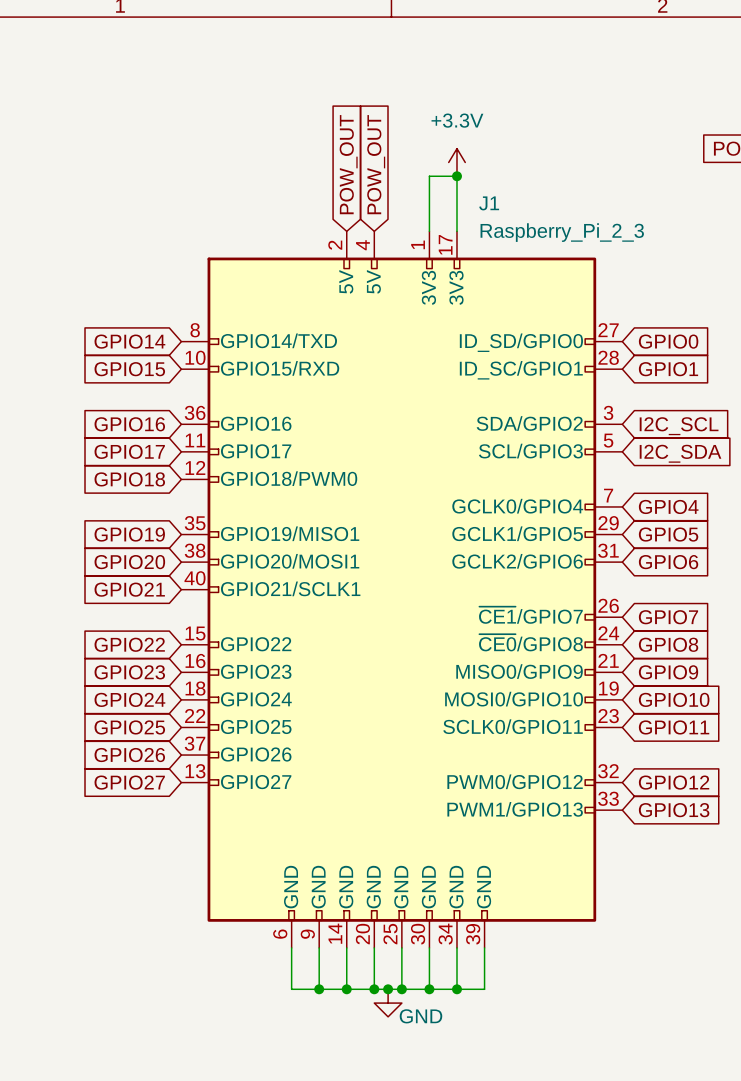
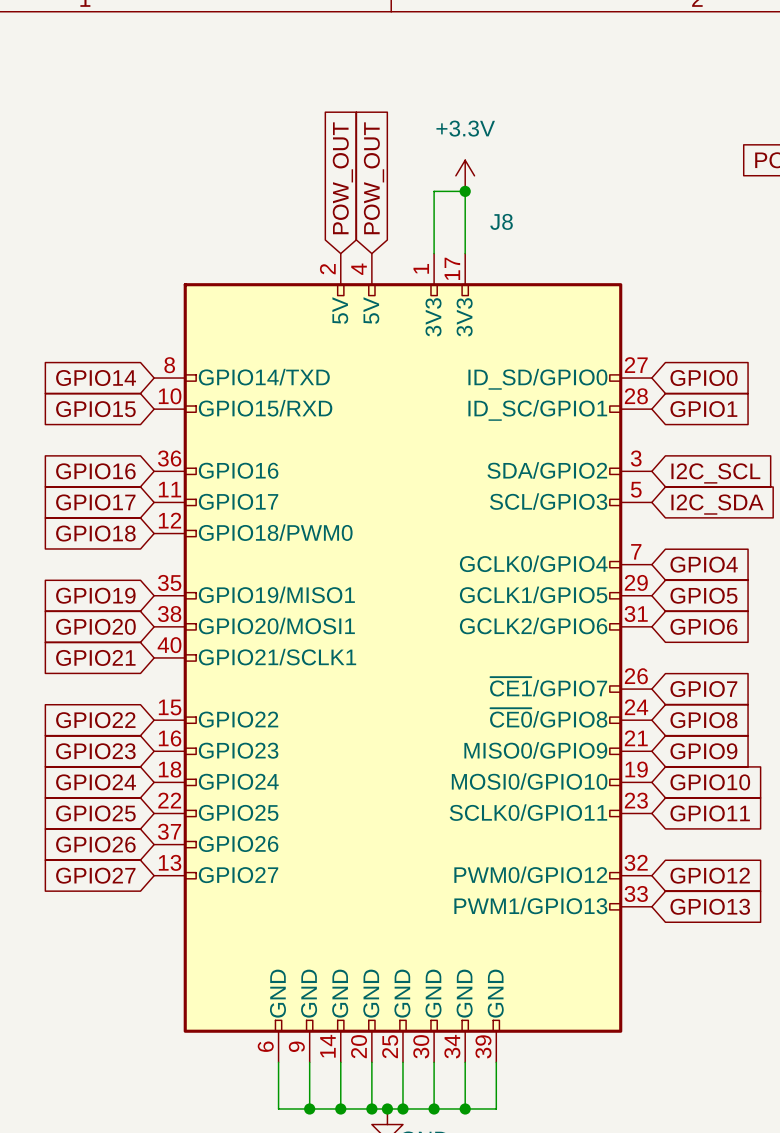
J1 name: J1 (489, 203) -> J8 (501, 221)
J1 value: Raspberry_Pi_2_3 (562, 232) -> none

